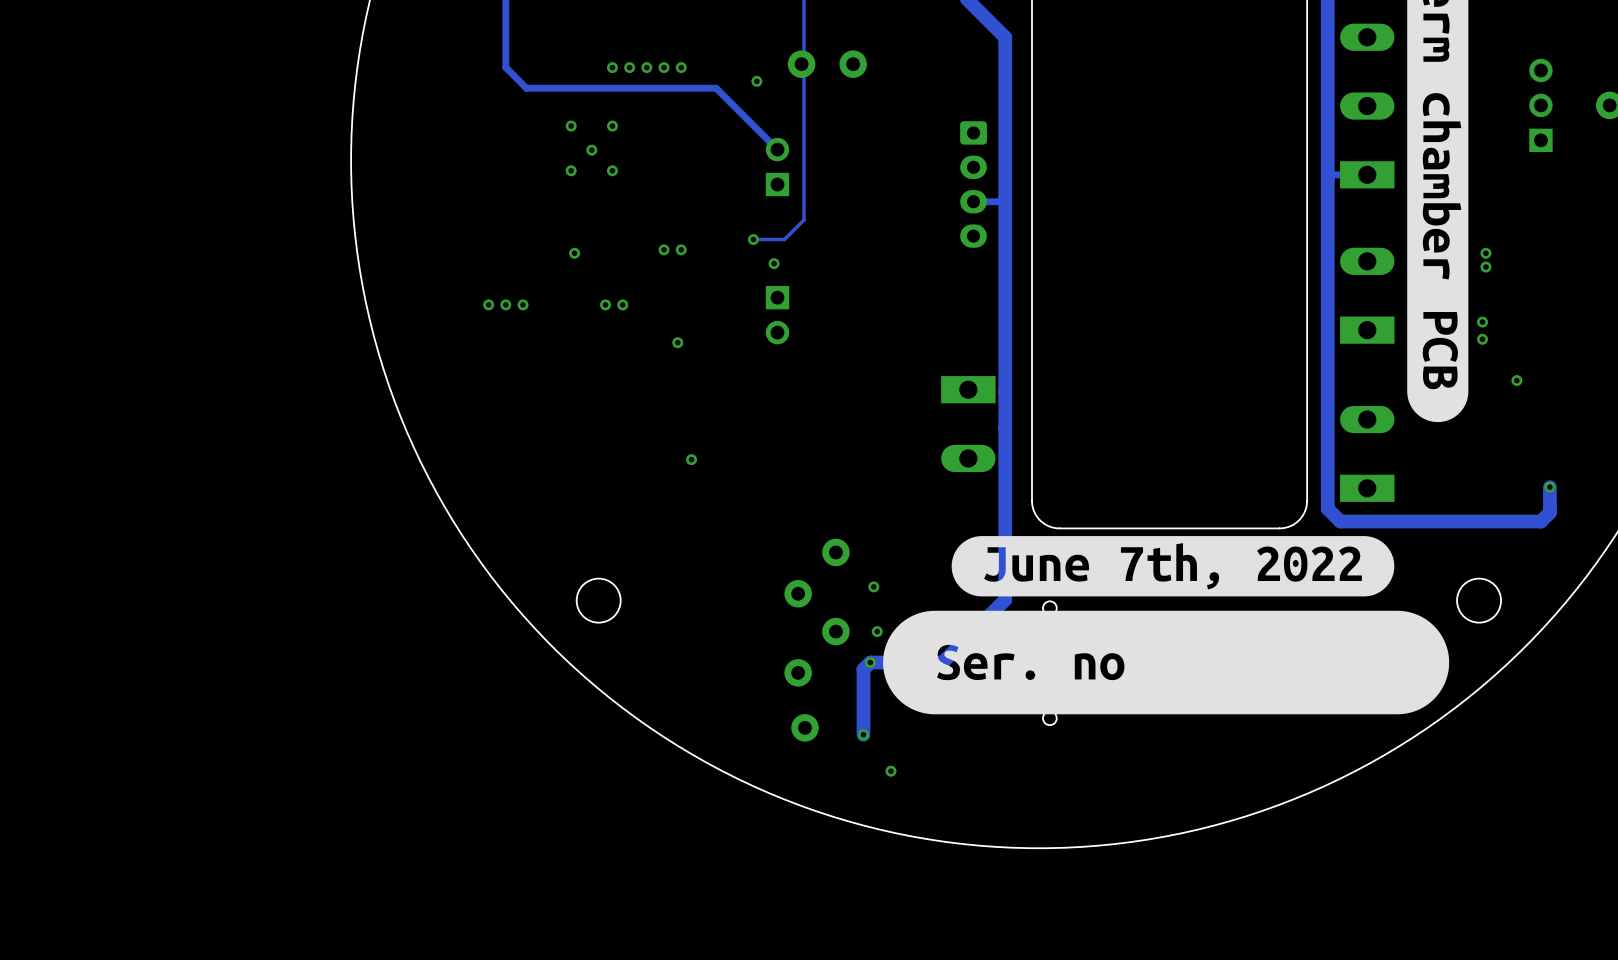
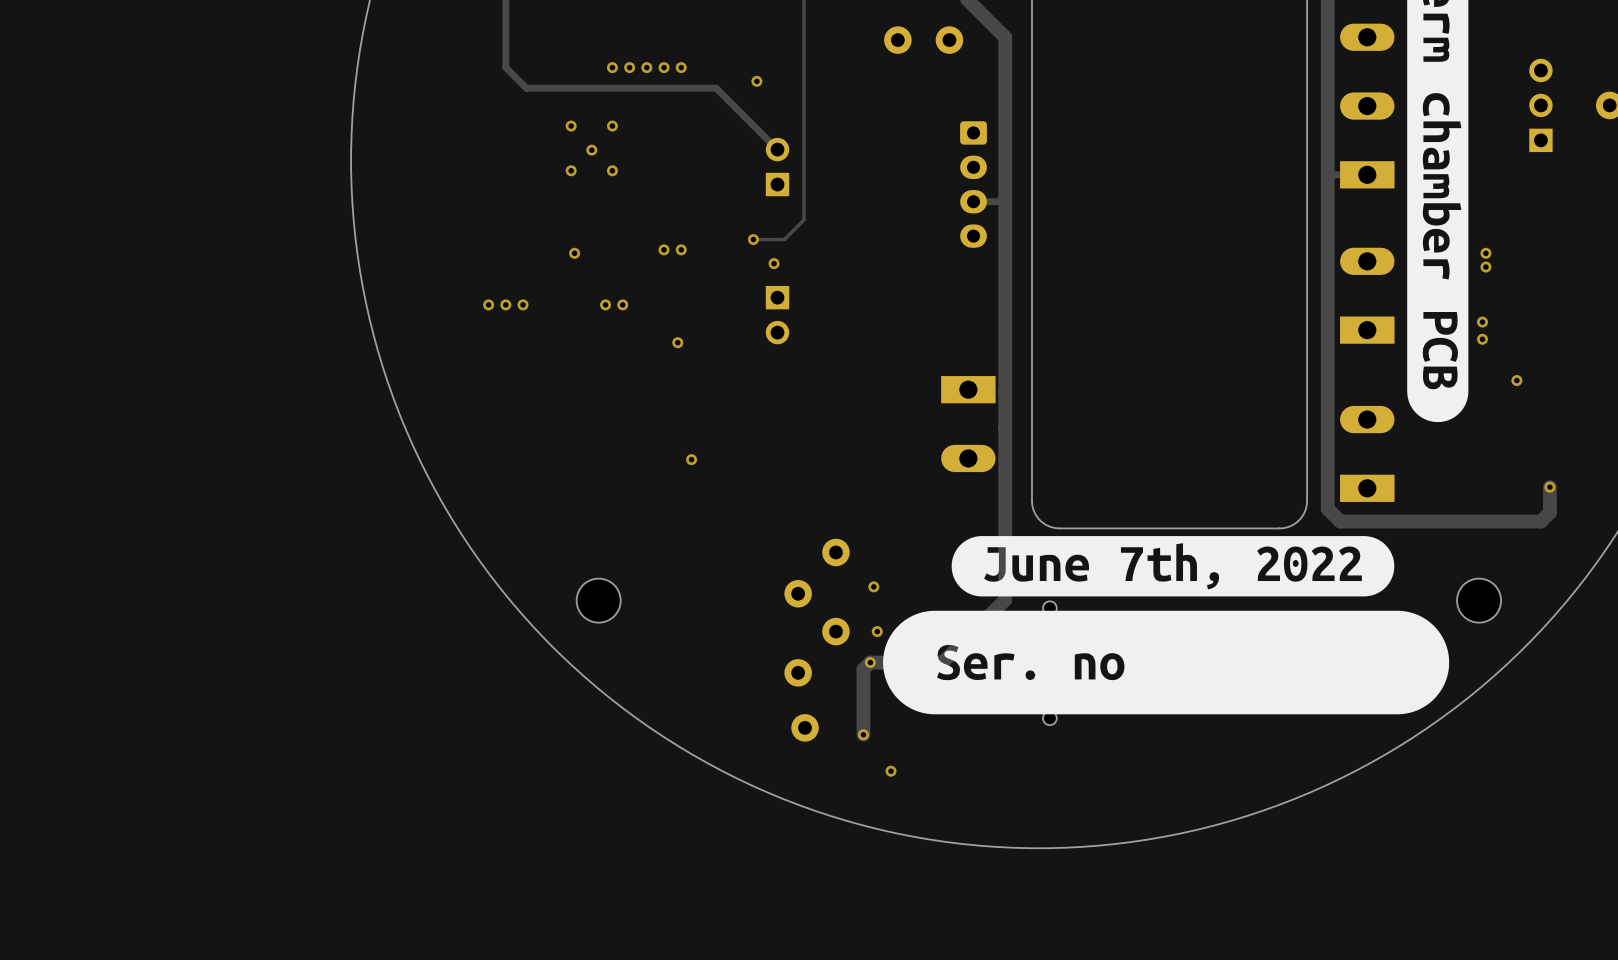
part: none -> (897, 40)
part: none -> (949, 40)
part: (801, 64) -> none
part: (853, 64) -> none

